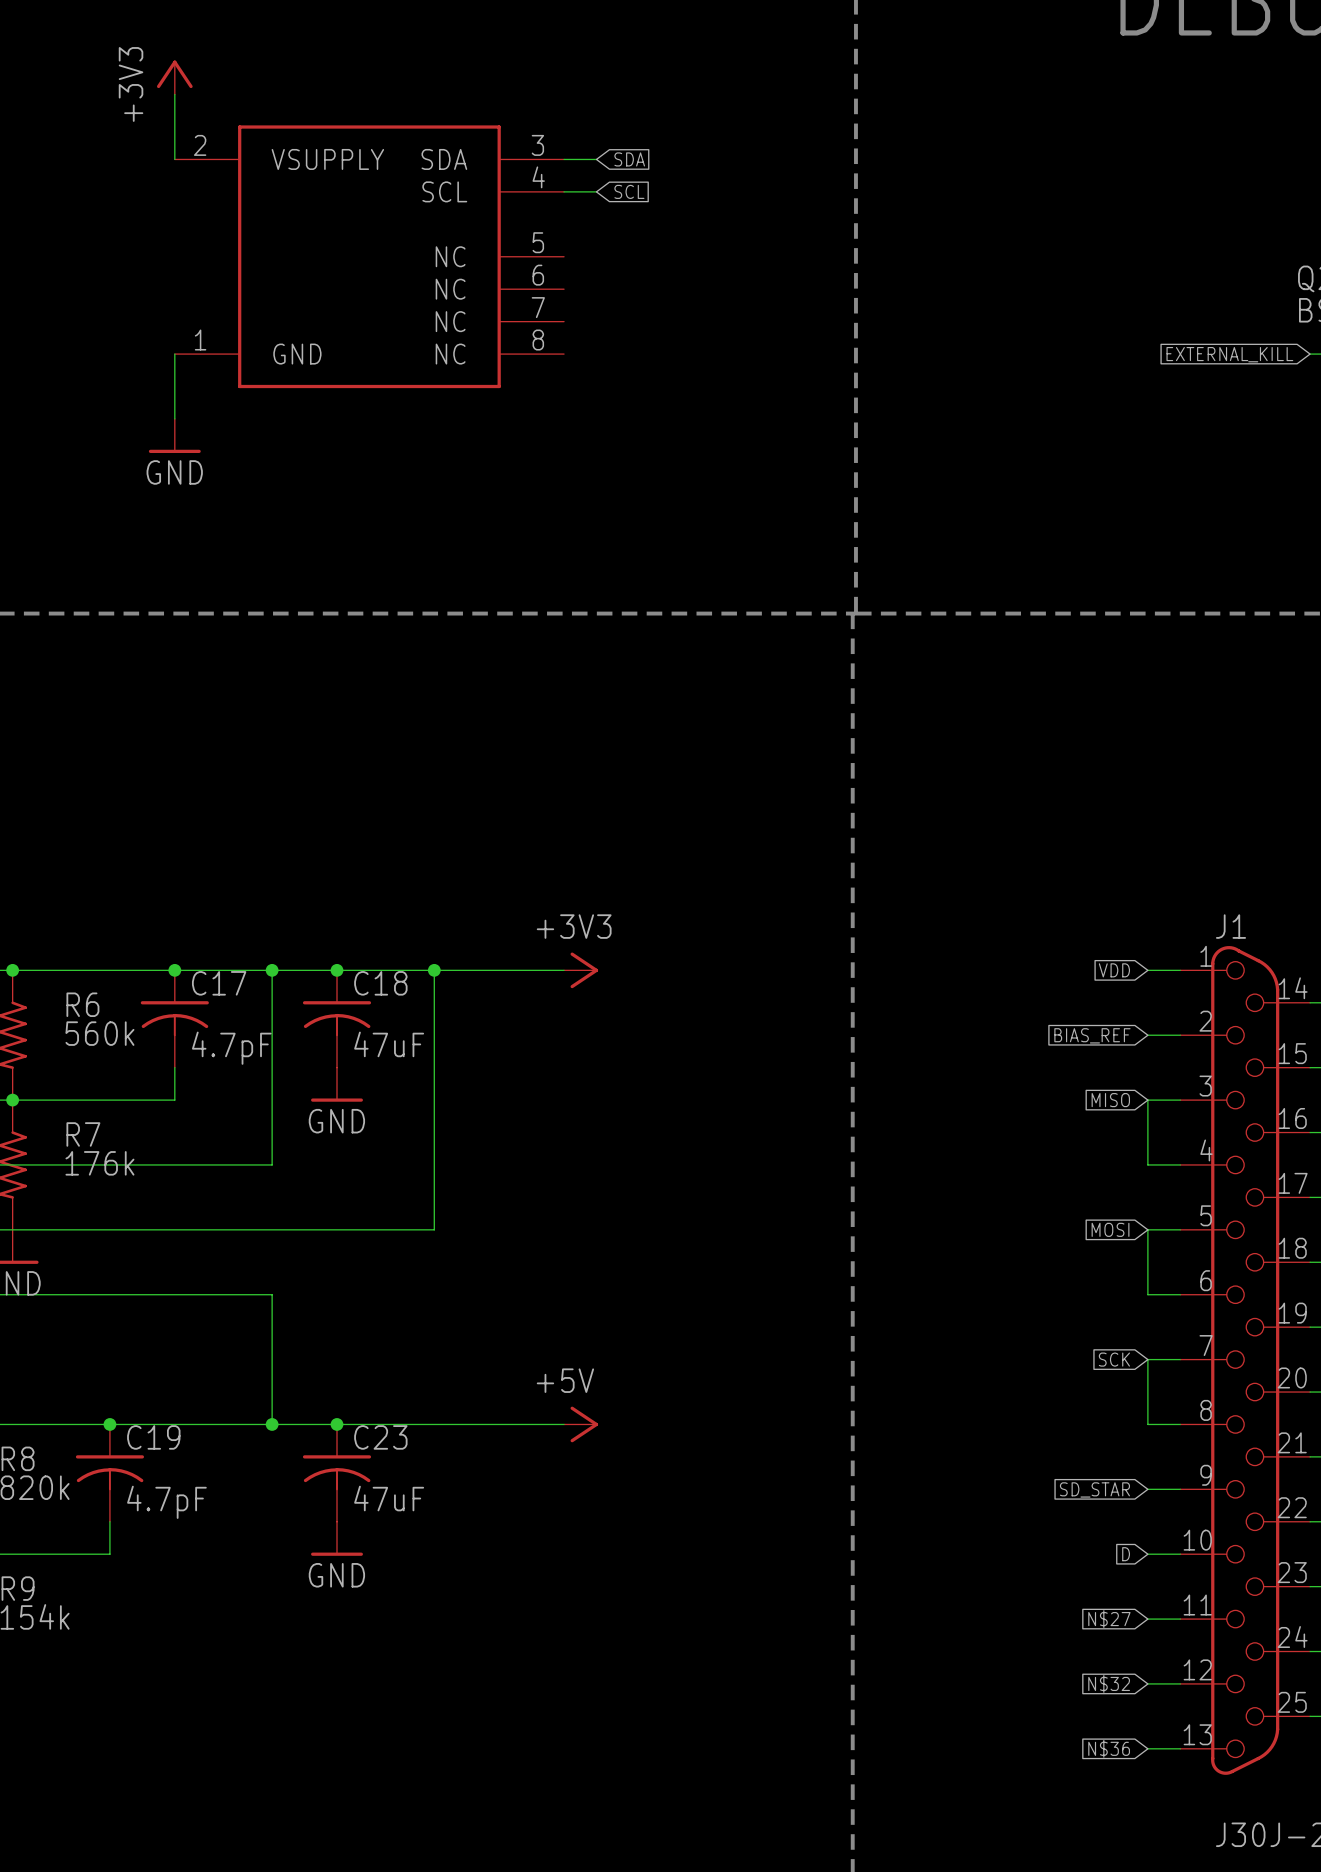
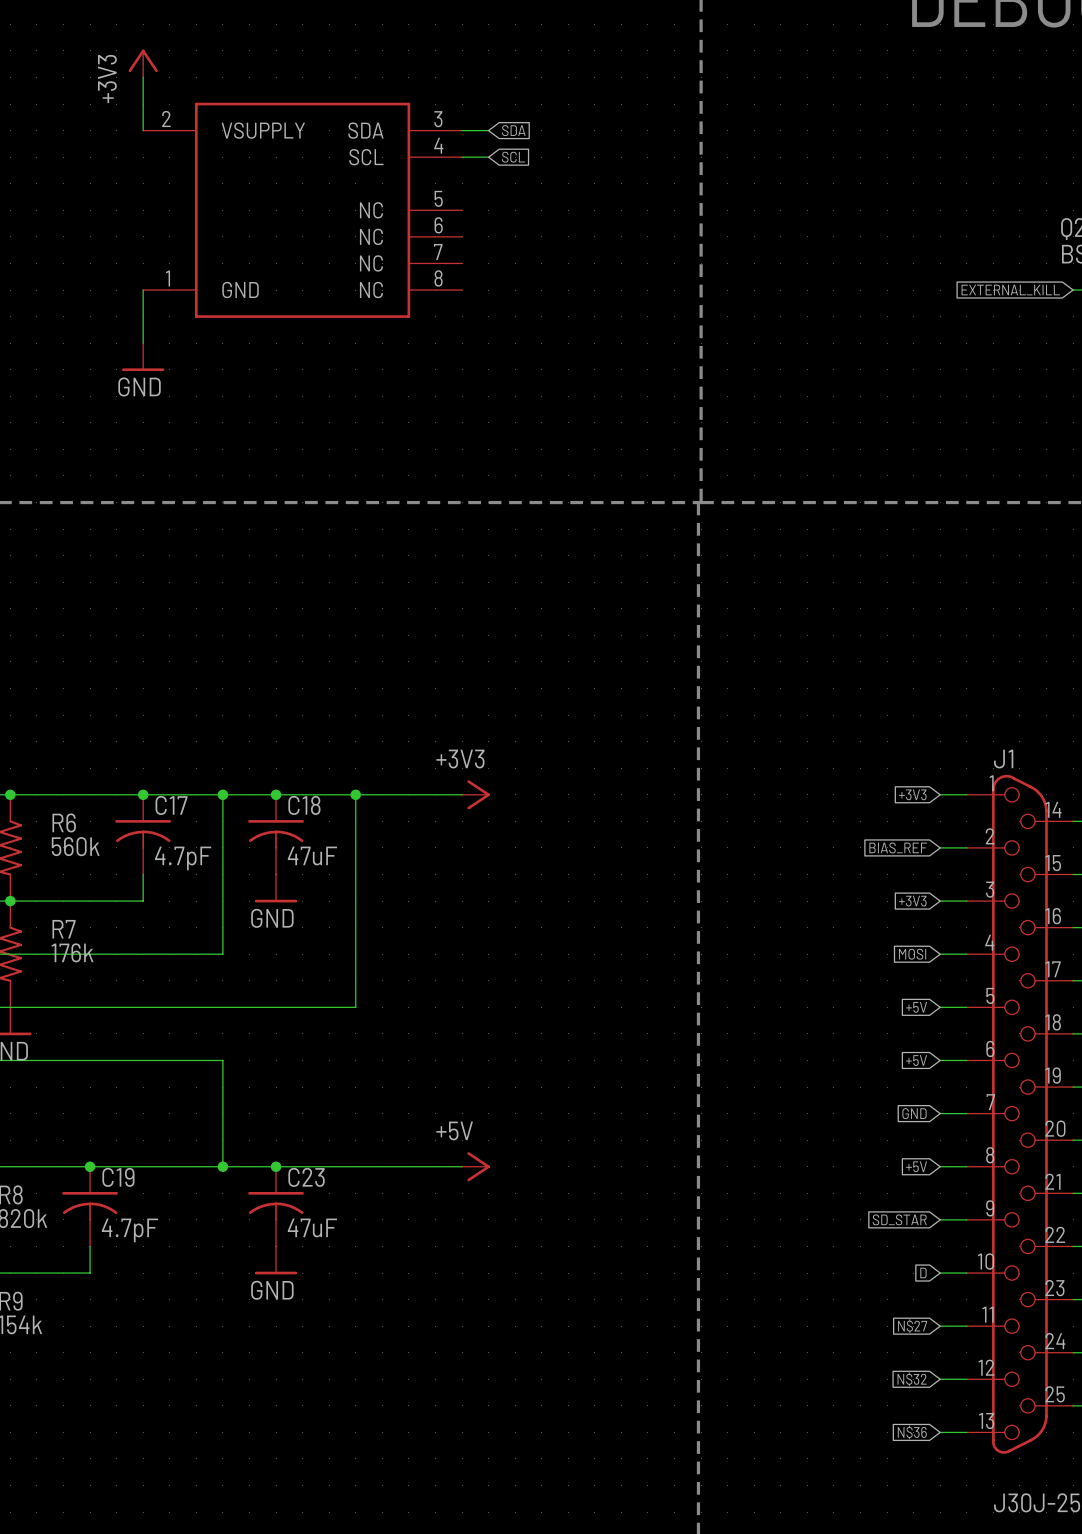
global label: VDD (1114, 970) -> +3V3 (912, 794)
global label: MISO (1110, 1100) -> +3V3 (912, 901)
wire: (1147, 1100) (1147, 1164) -> none
global label: none -> MOSI (912, 954)
global label: MOSI (1110, 1229) -> +5V (916, 1007)
wire: (1147, 1229) (1147, 1294) -> none
global label: none -> +5V (916, 1060)
global label: SCK (1114, 1359) -> GND (914, 1113)
wire: (1147, 1359) (1147, 1424) -> none
global label: none -> +5V (916, 1166)

